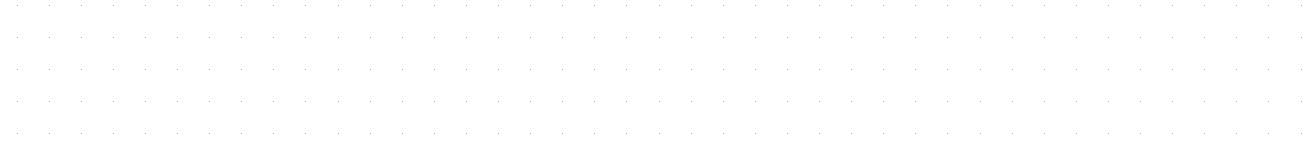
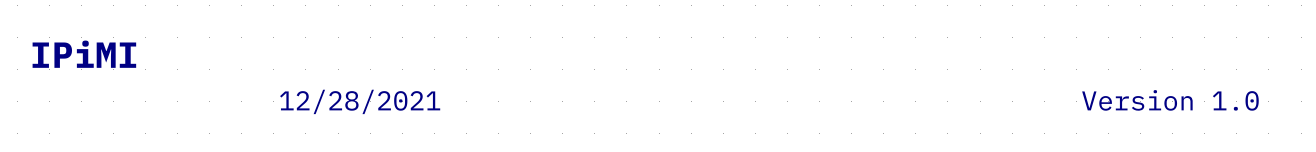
text: none -> IPiMI (84, 54)
text: none -> Version 1.0 (1170, 100)
text: none -> 12/28/2021 (360, 101)

